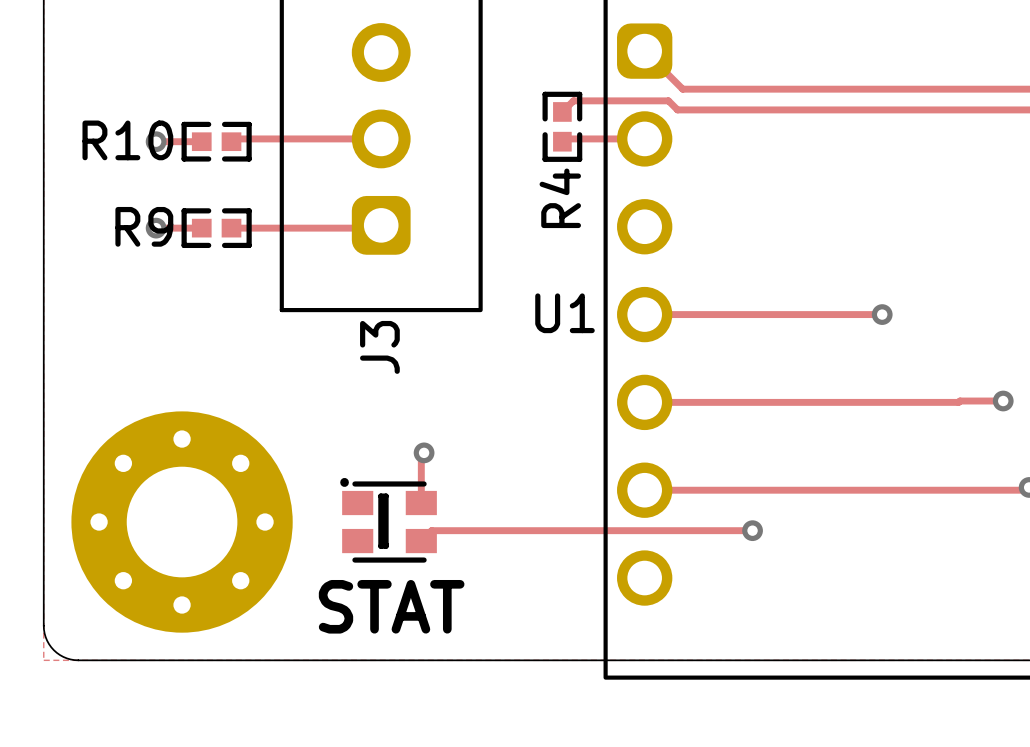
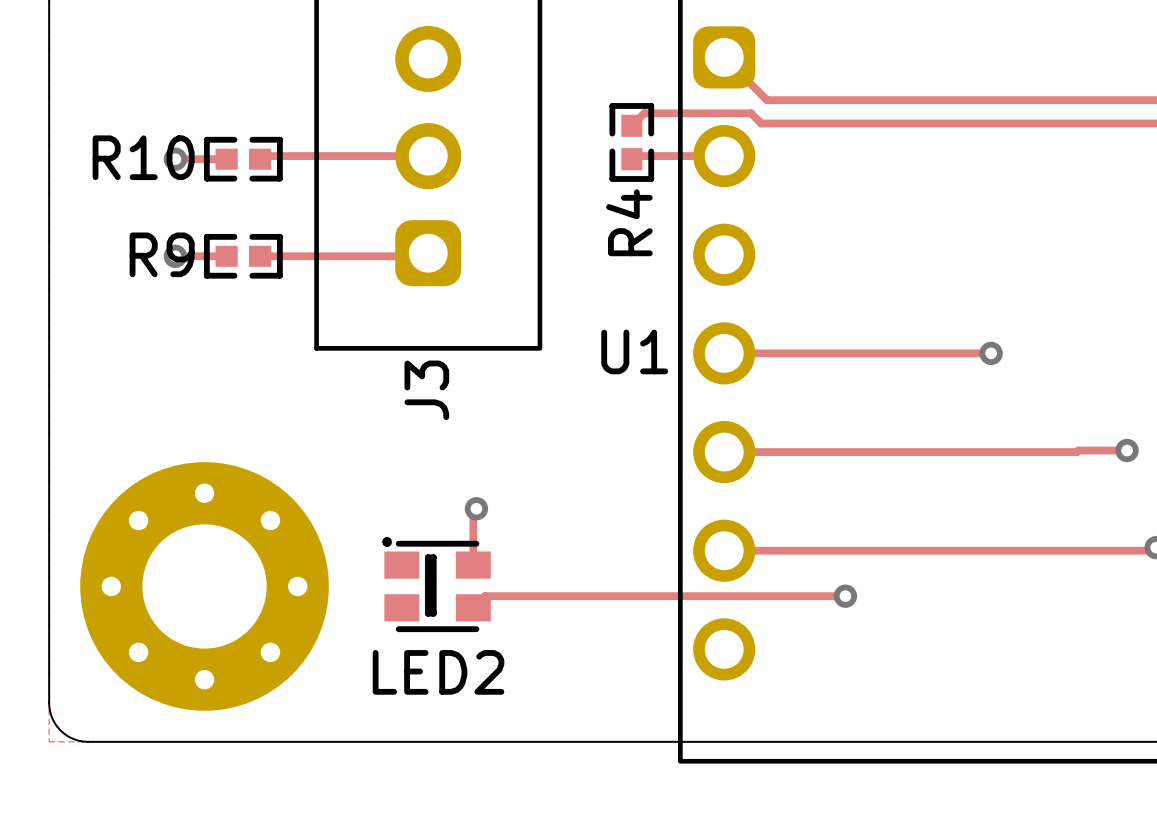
LED2 name: none -> LED2 (438, 672)
text: STAT (391, 606) -> none

